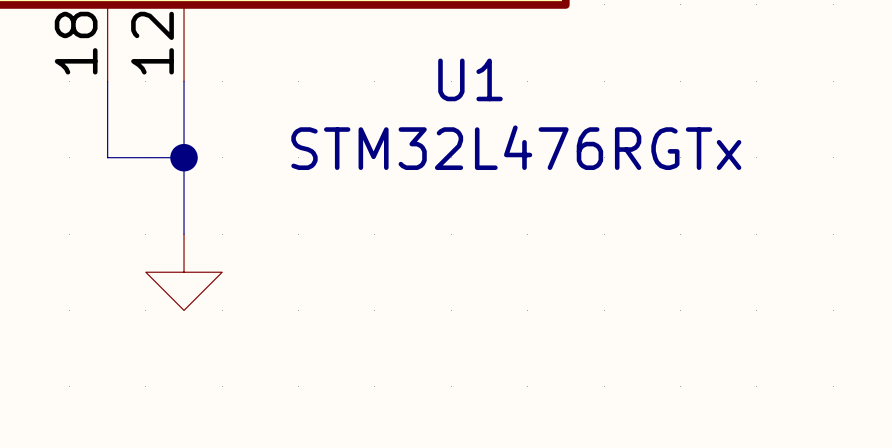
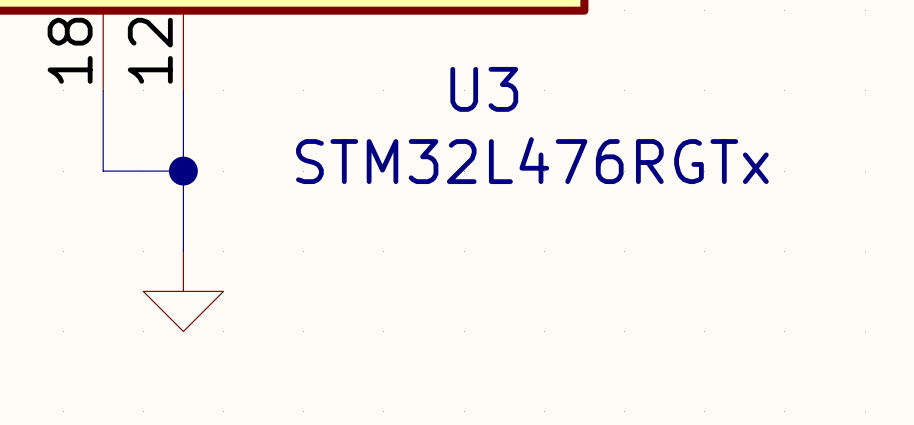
U1 name: U1 (470, 79) -> U3 (484, 89)

